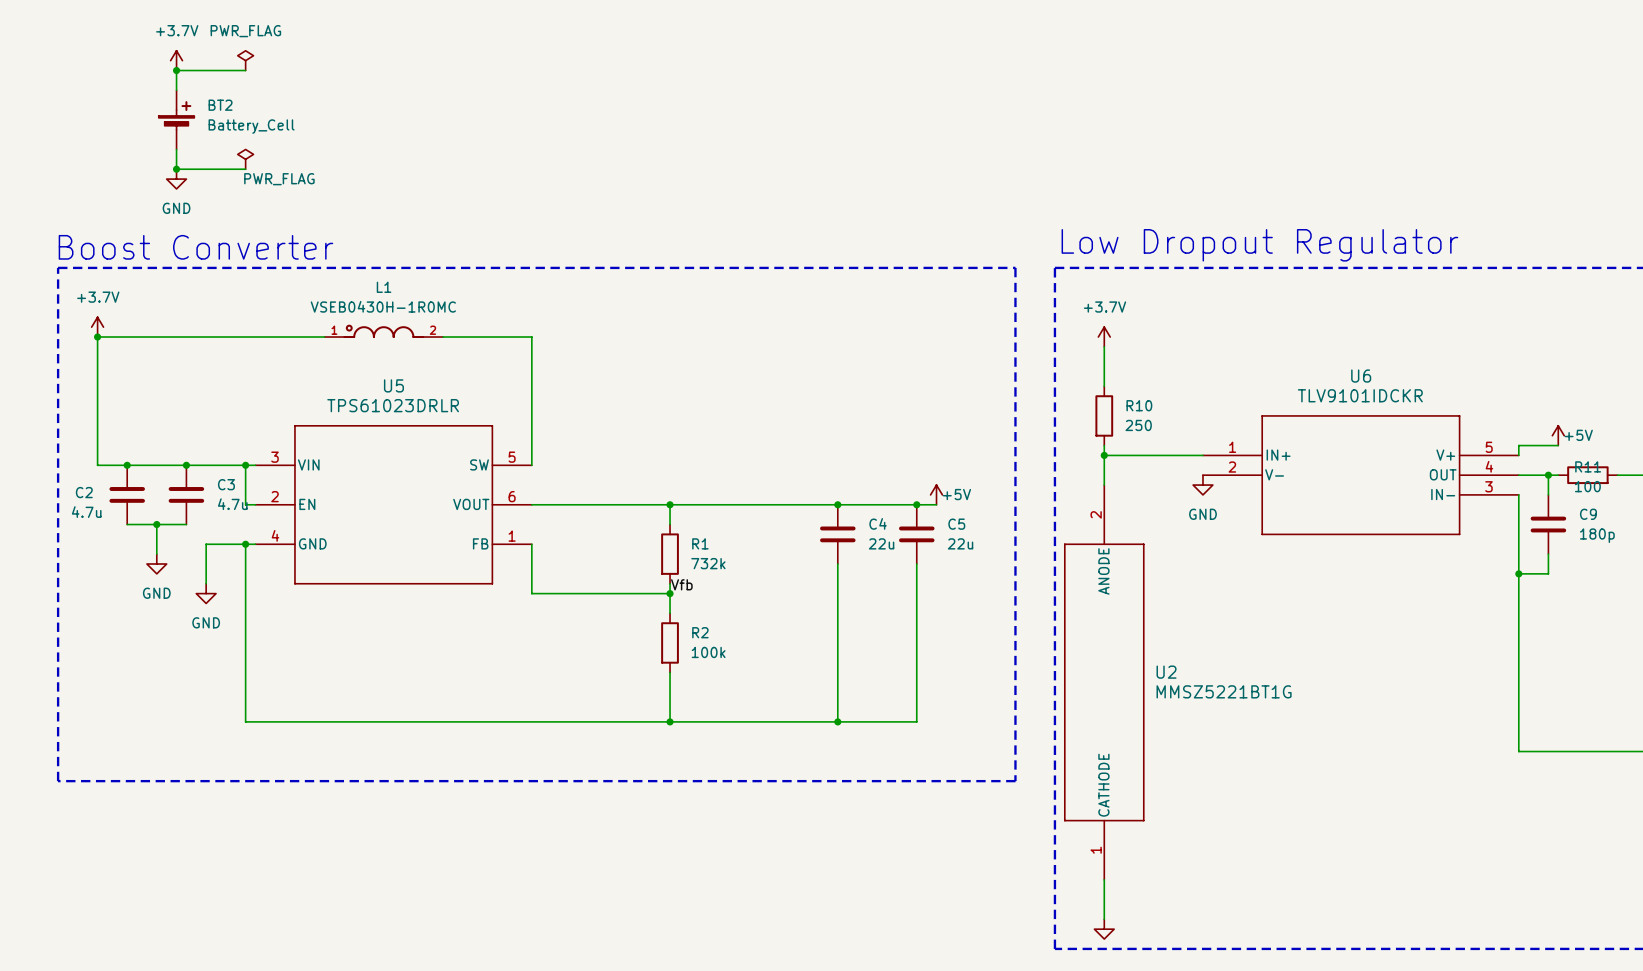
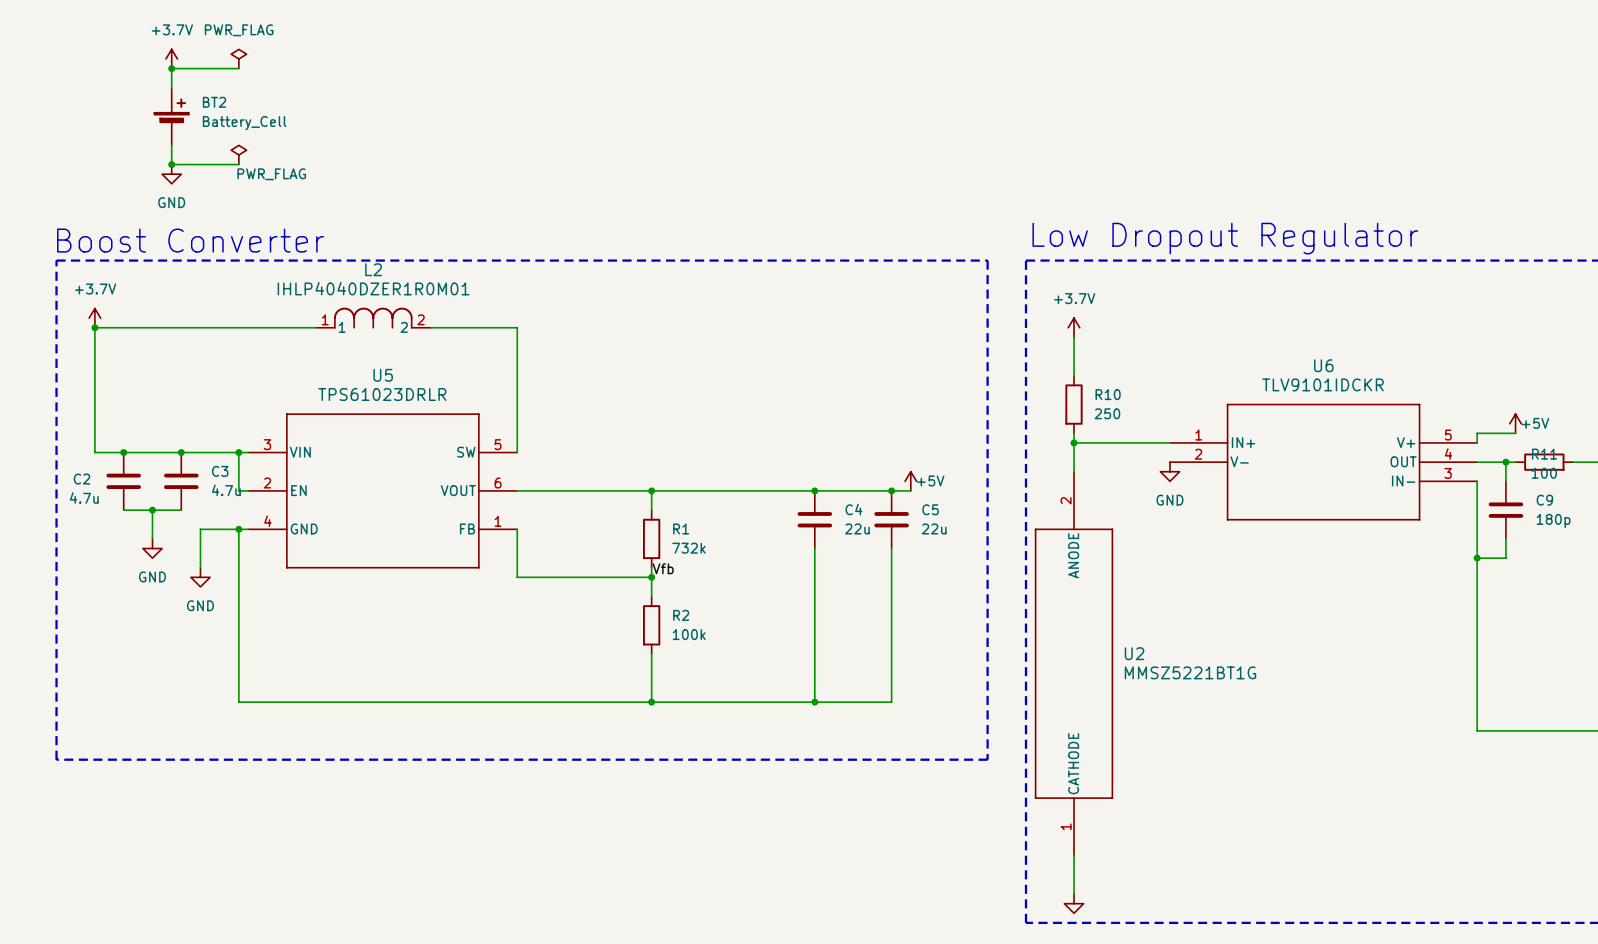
L2: none -> IHLP4040DZER1R0M01 (373, 318)
L1: VSEB0430H-1R0MC (383, 331) -> none

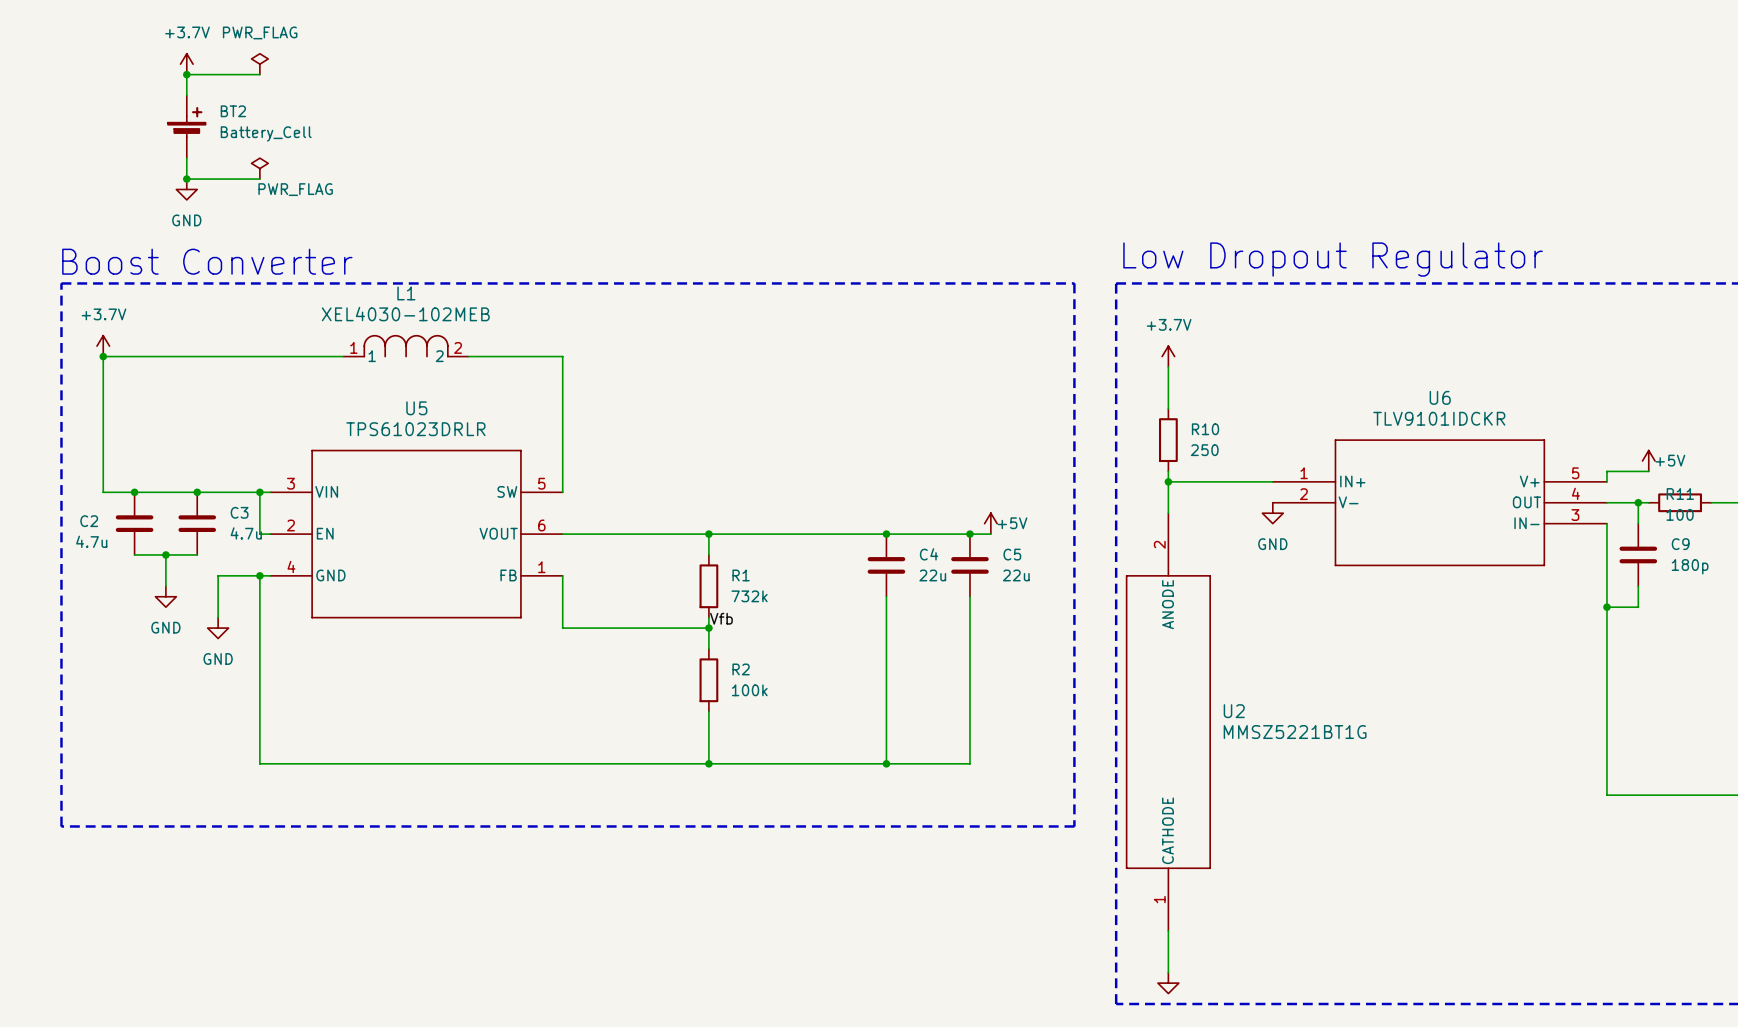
L2: IHLP4040DZER1R0M01 (373, 318) -> none
L1: none -> XEL4030-102MEB (406, 346)

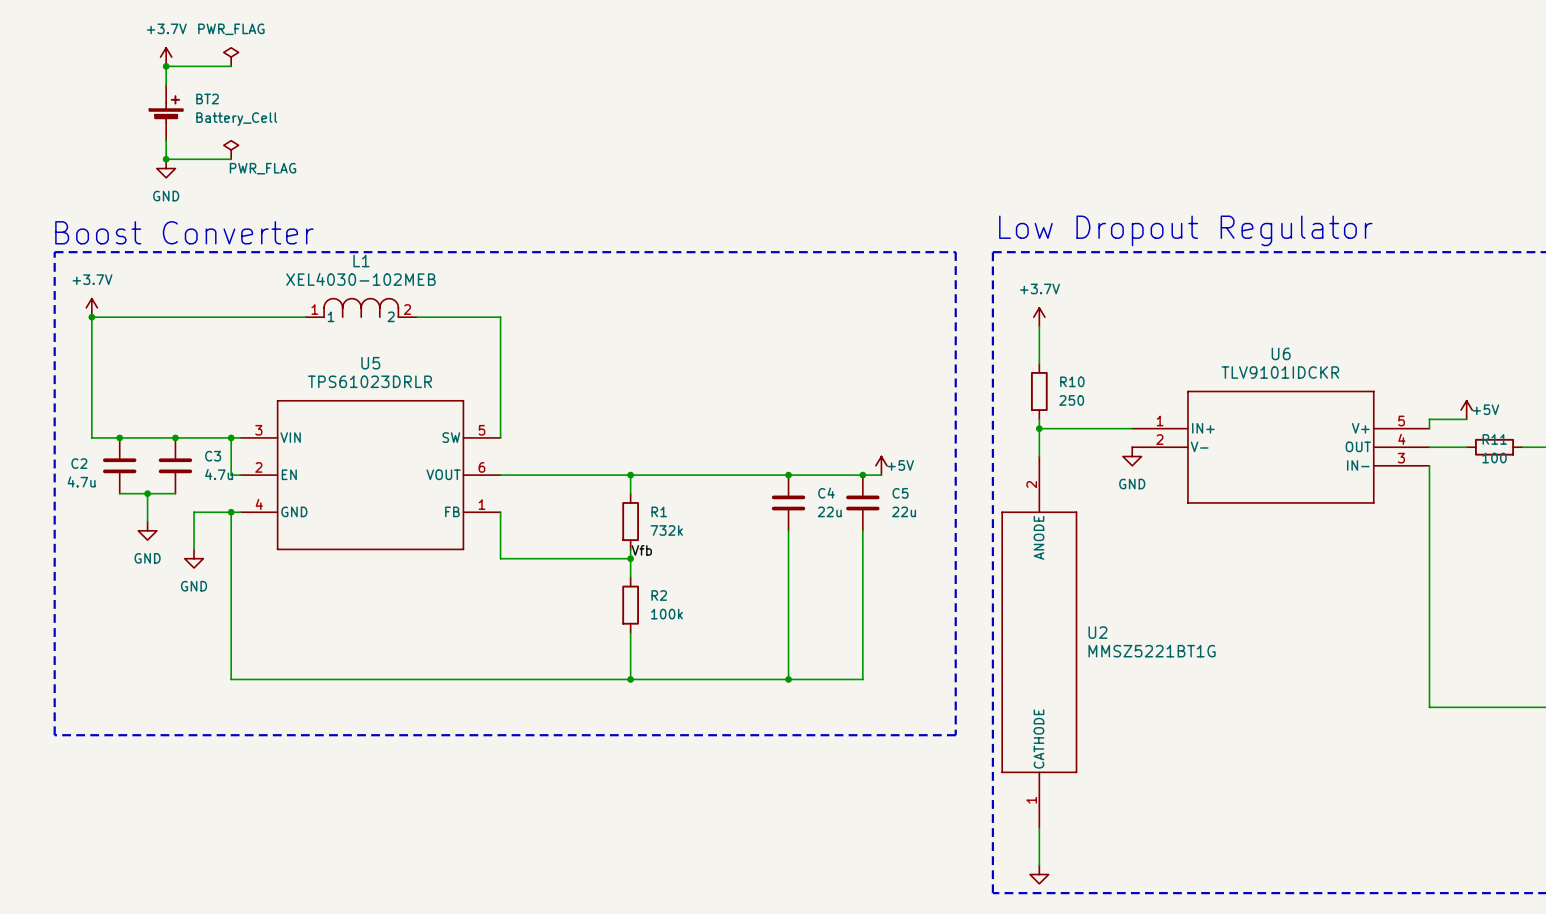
wire: (1638, 502) (1638, 523) -> none
junction: (1638, 502) -> none
C9: 180p (1638, 554) -> none
wire: (1638, 586) (1638, 607) (1606, 607) -> none
junction: (1606, 607) -> none

